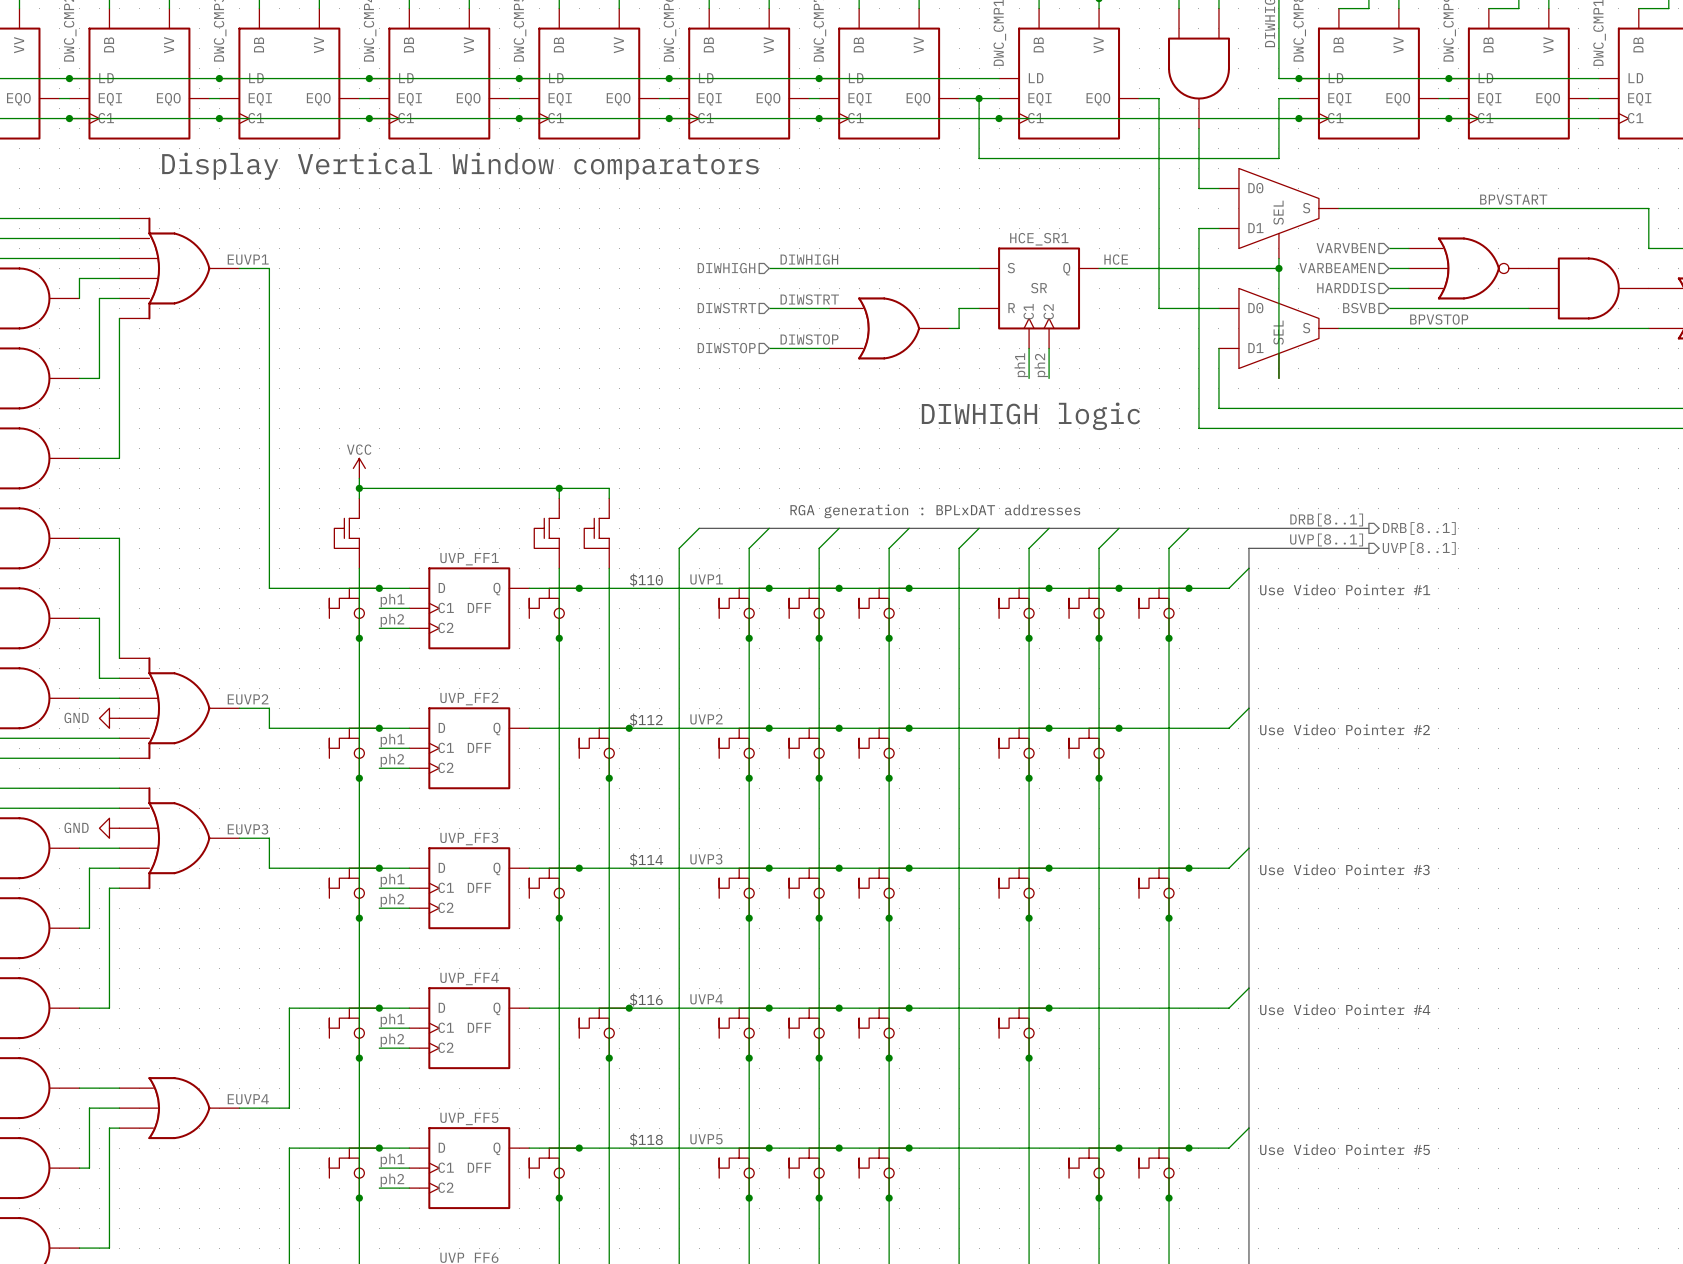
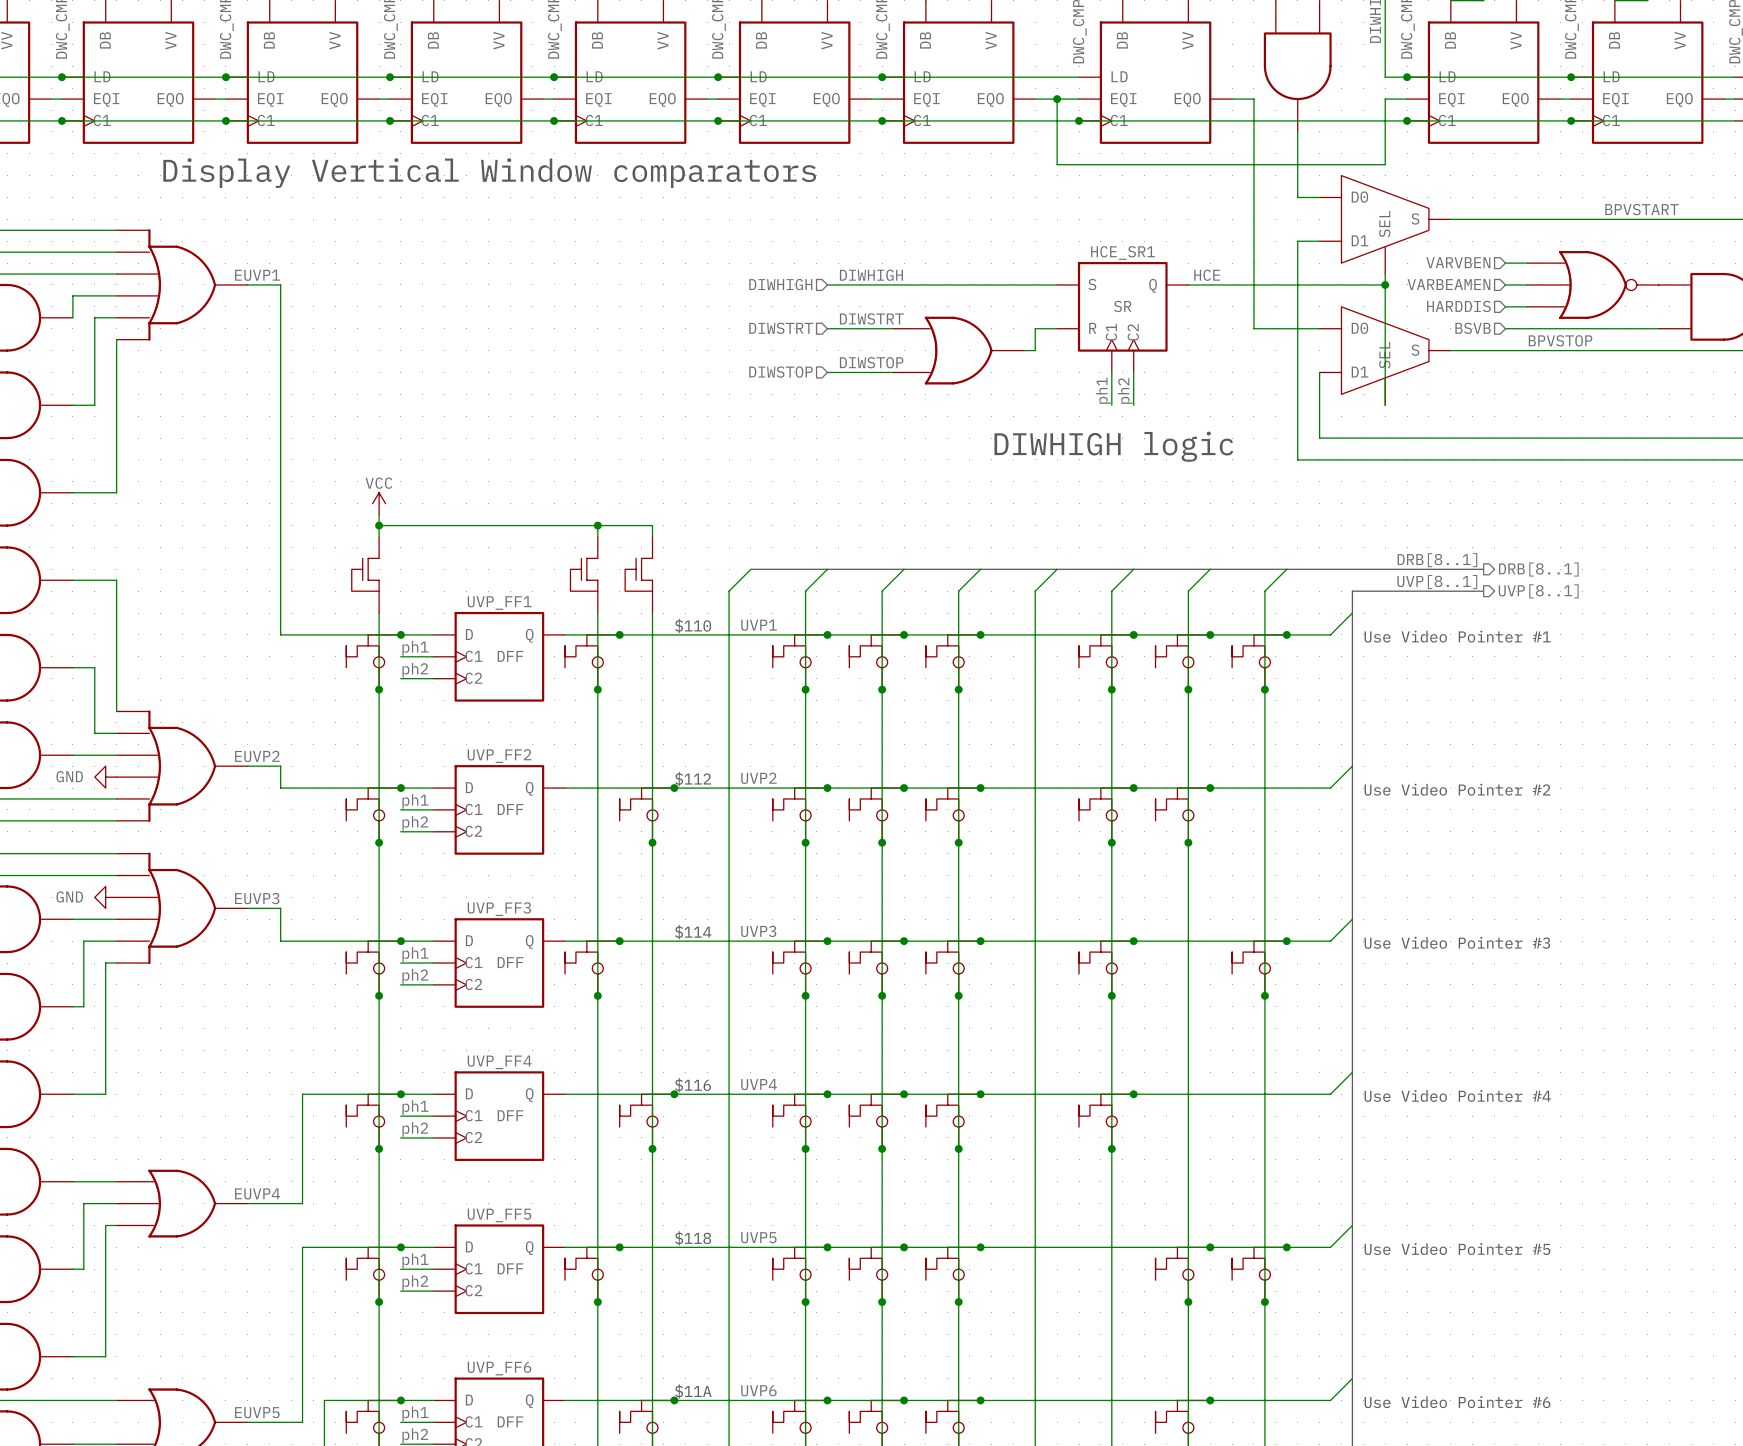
text: RGA generation : BPLxDAT addresses (935, 511) -> none

